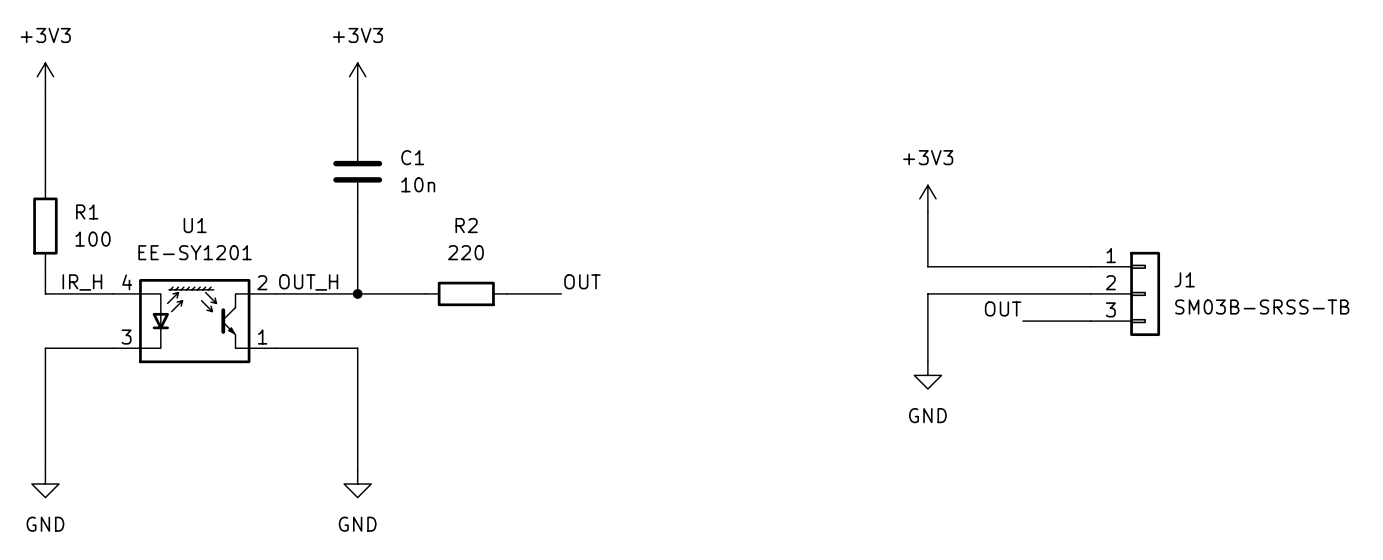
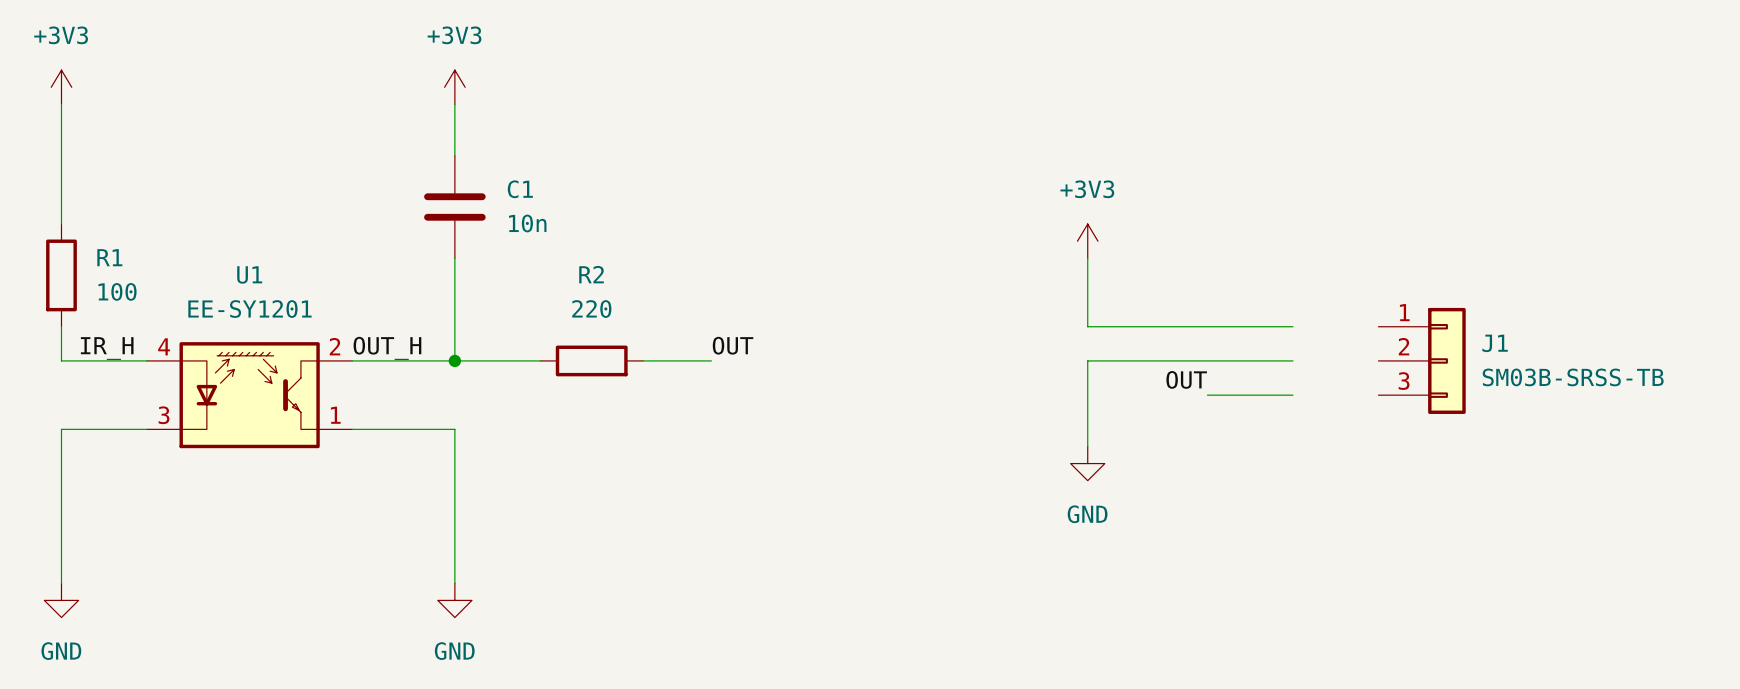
power symbol position: +3V3 (927, 198) -> +3V3 (1087, 241)
wire: (927, 212) (927, 266) -> (1087, 258) (1087, 326) (1173, 326)
wire: (1022, 266) (1090, 266) -> none
wire: (927, 293) (927, 361) -> (1173, 360) (1087, 360) (1087, 446)
wire: (1022, 293) (1090, 293) -> none
label position: OUT (1003, 308) -> OUT (1186, 379)
wire: (1022, 321) (1090, 321) -> (1292, 395) (1207, 395)
power symbol position: GND (927, 375) -> GND (1087, 463)

